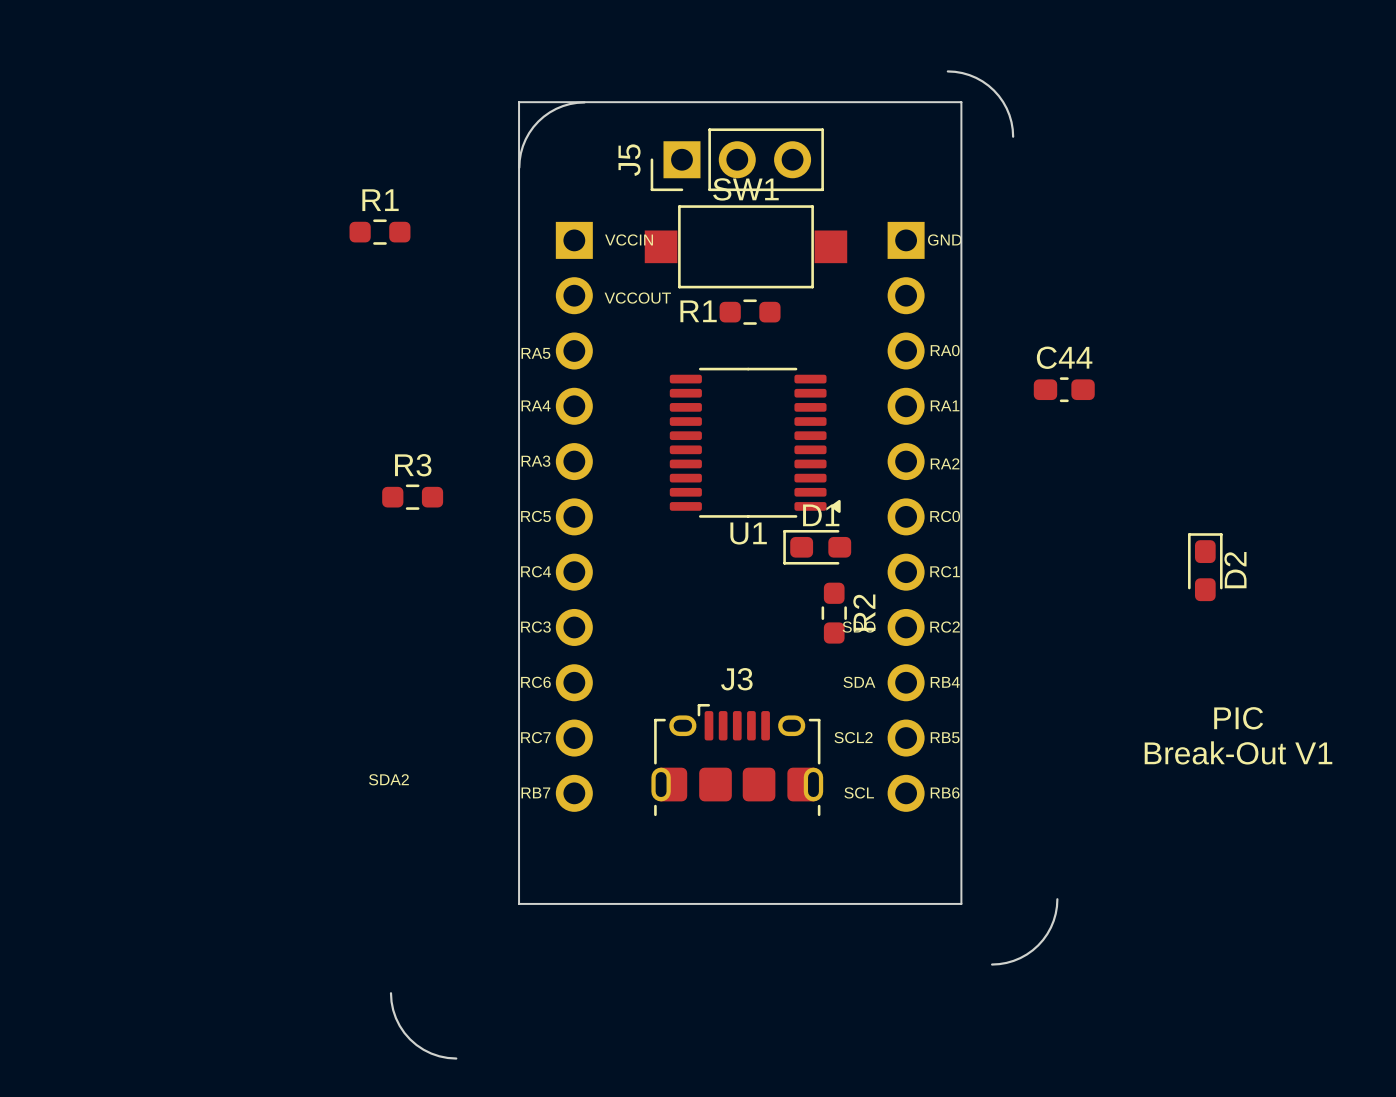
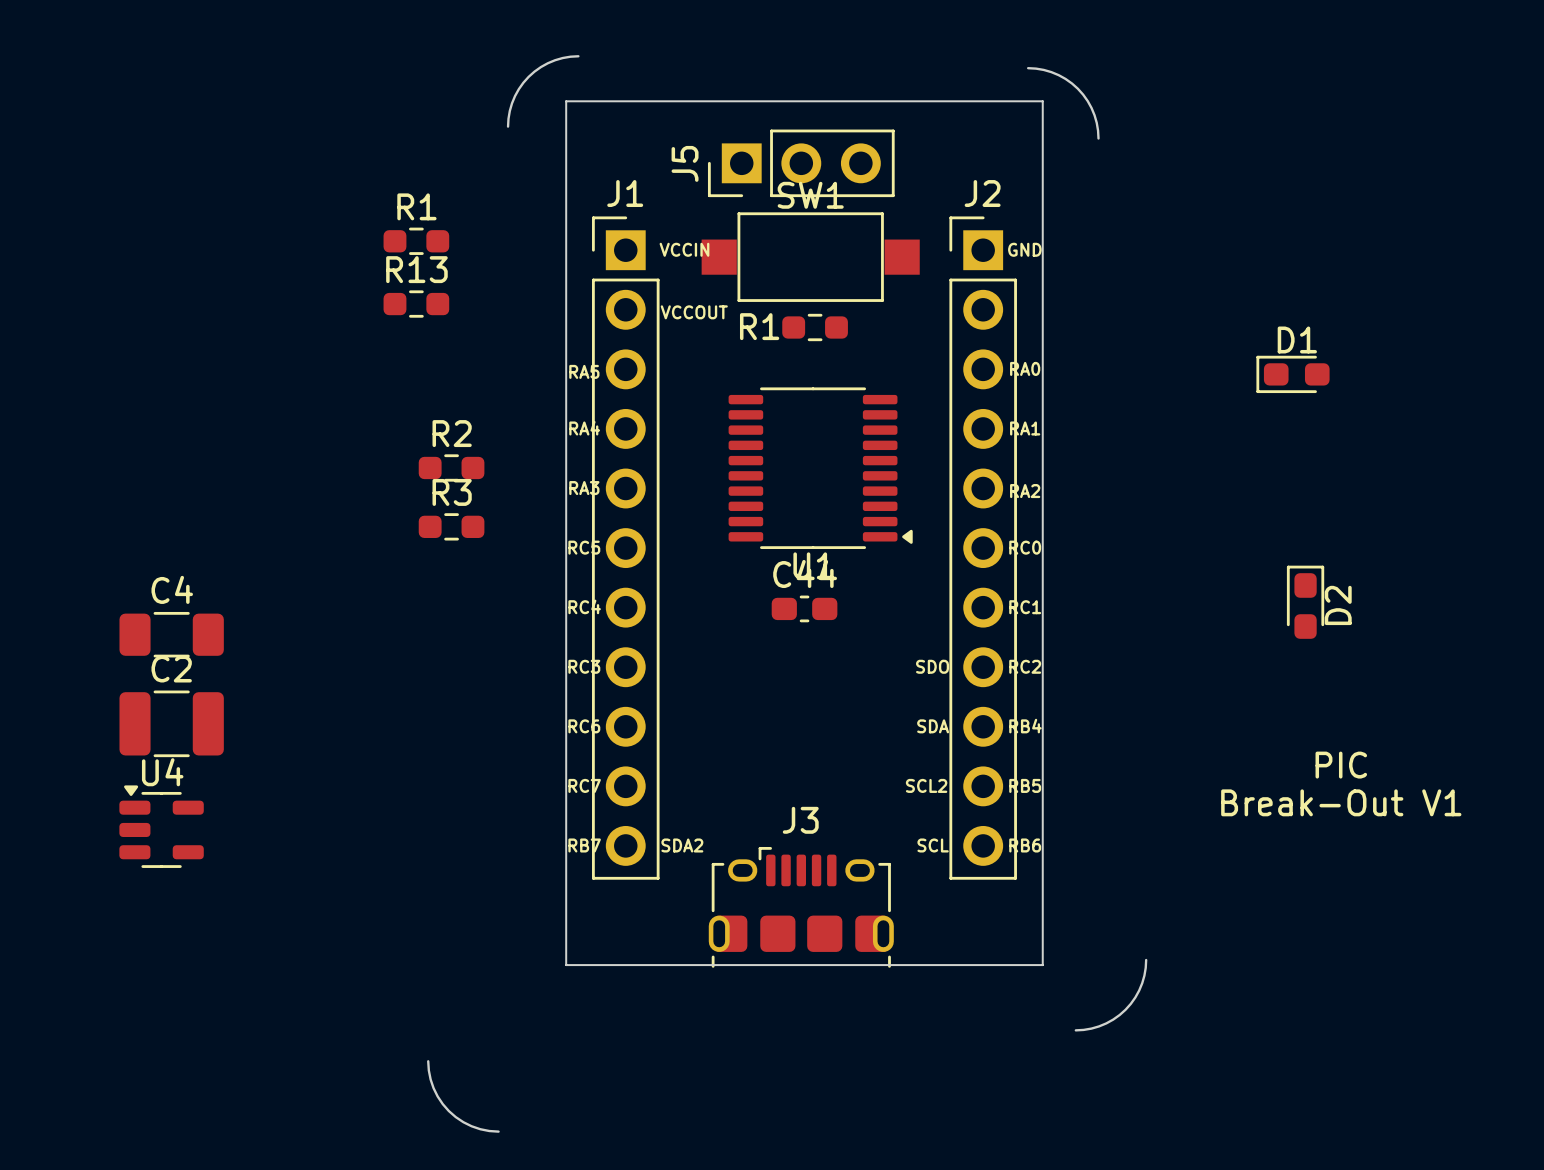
board edge: (584, 102) (570, 104) (556, 108) (538, 121) (529, 132) (522, 146) (519, 167) -> (578, 56) (562, 58) (547, 63) (528, 76) (515, 96) (509, 110) (508, 126)
R13: none -> (416, 304)
C44 position: (1064, 389) -> (804, 608)
J1 side: bottom (574, 516) -> top (625, 548)
J2 side: bottom (906, 516) -> top (983, 548)
D1 position: (817, 547) -> (1293, 374)
C4: none -> (171, 634)
R2 name position: R2 (864, 612) -> R2 (452, 433)
R2 rotation: 0° (834, 613) -> 90° clockwise (451, 467)
R2 position: (834, 613) -> (451, 467)
C2: none -> (171, 723)
J3 position: (737, 760) -> (801, 907)
U4: none -> (161, 826)
text position: SDA2 (388, 779) -> SDA2 (682, 845)

